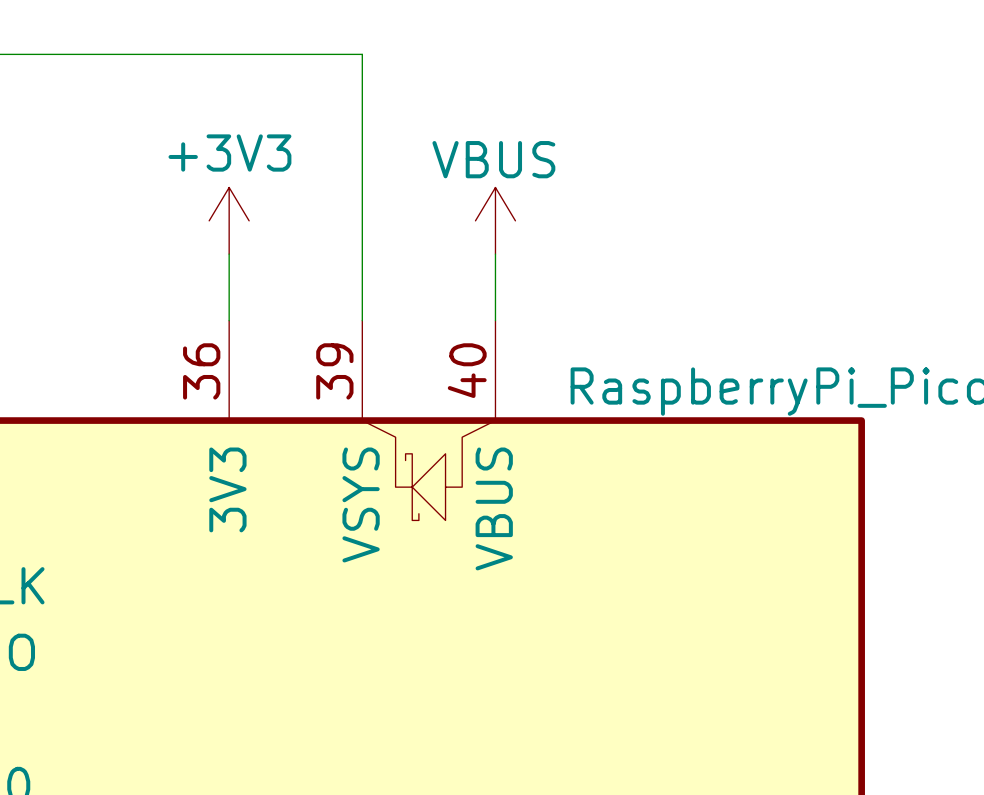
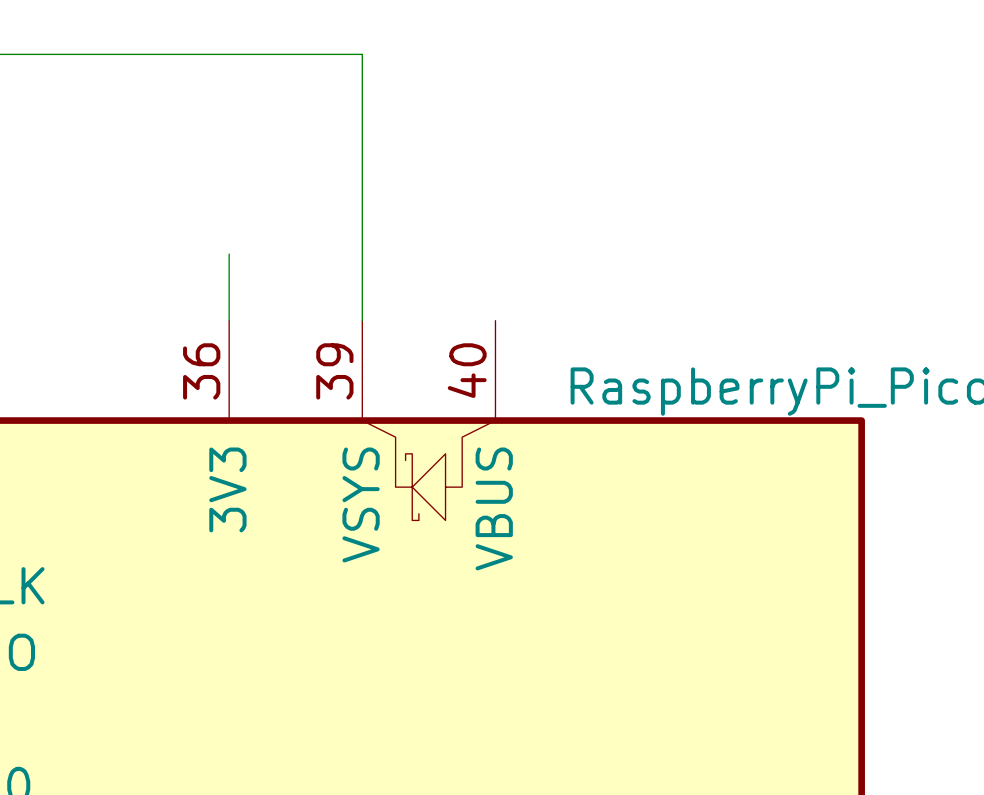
power symbol: +3V3 (229, 220) -> none
power symbol: VBUS (495, 220) -> none
wire: (495, 254) (495, 320) -> none

